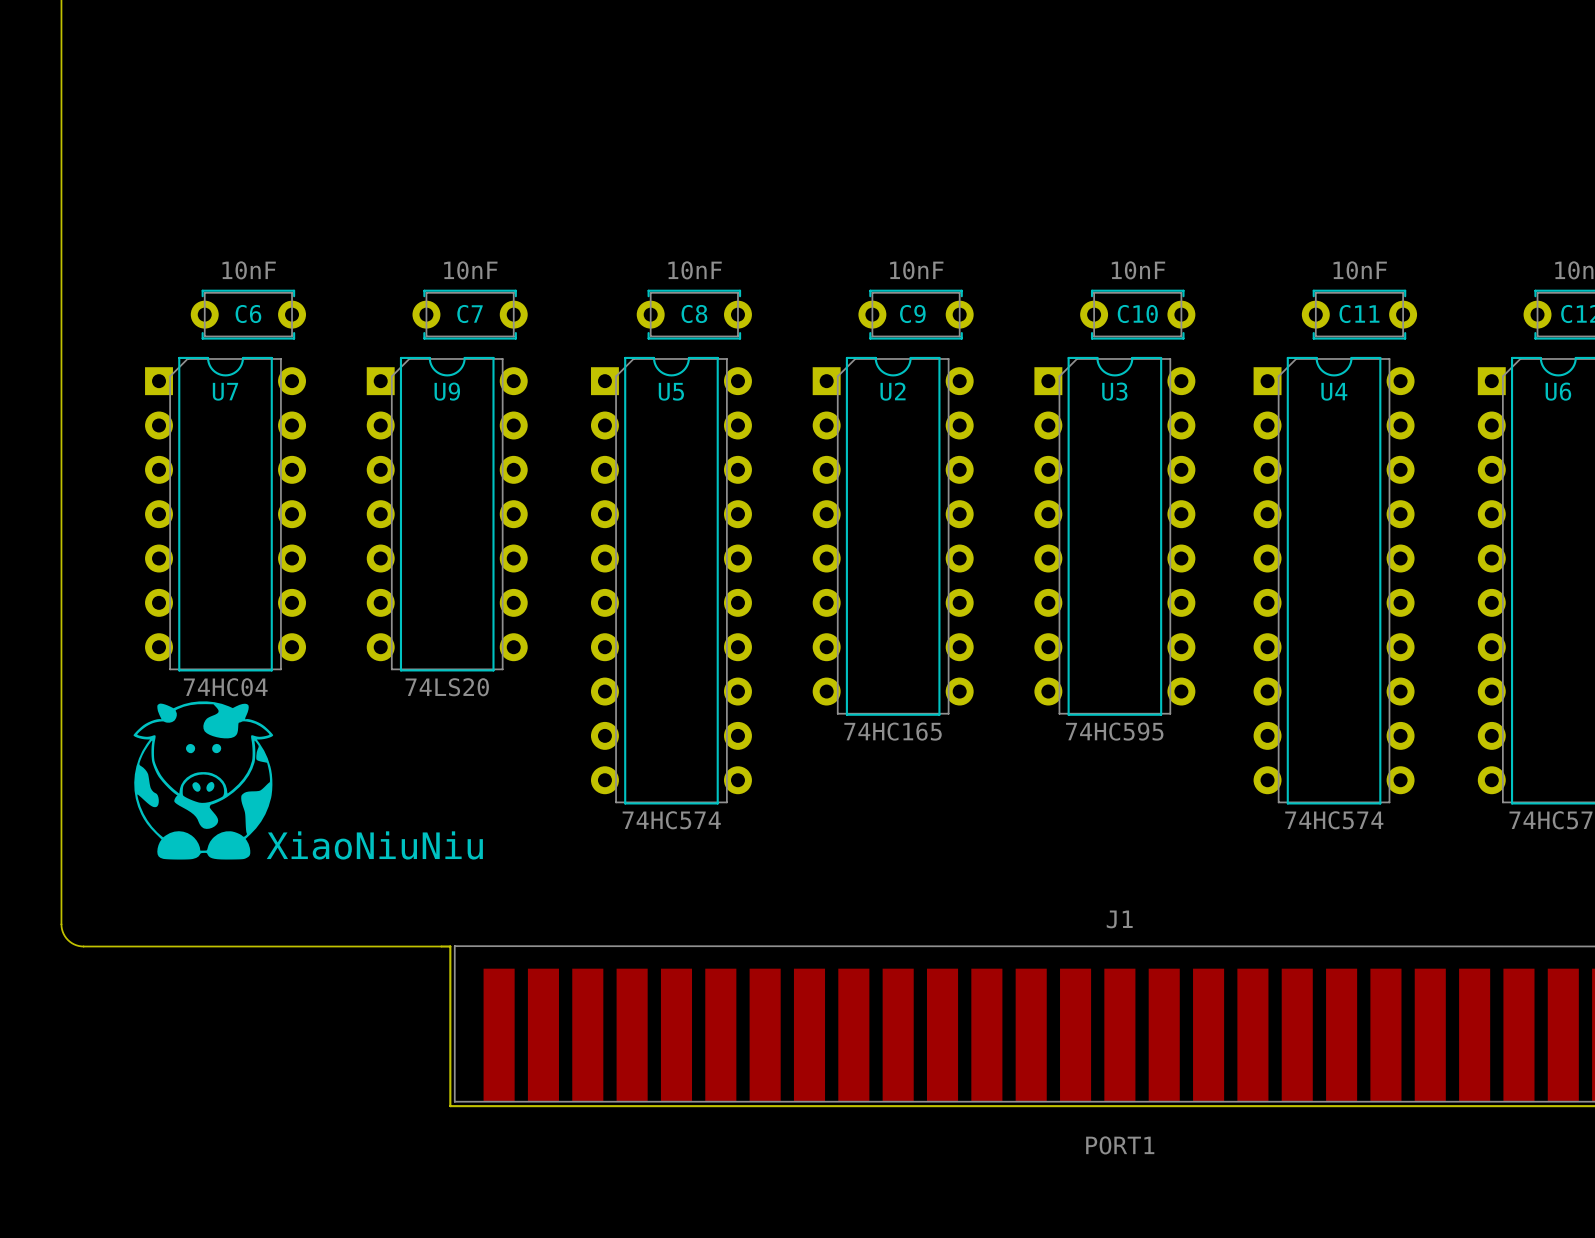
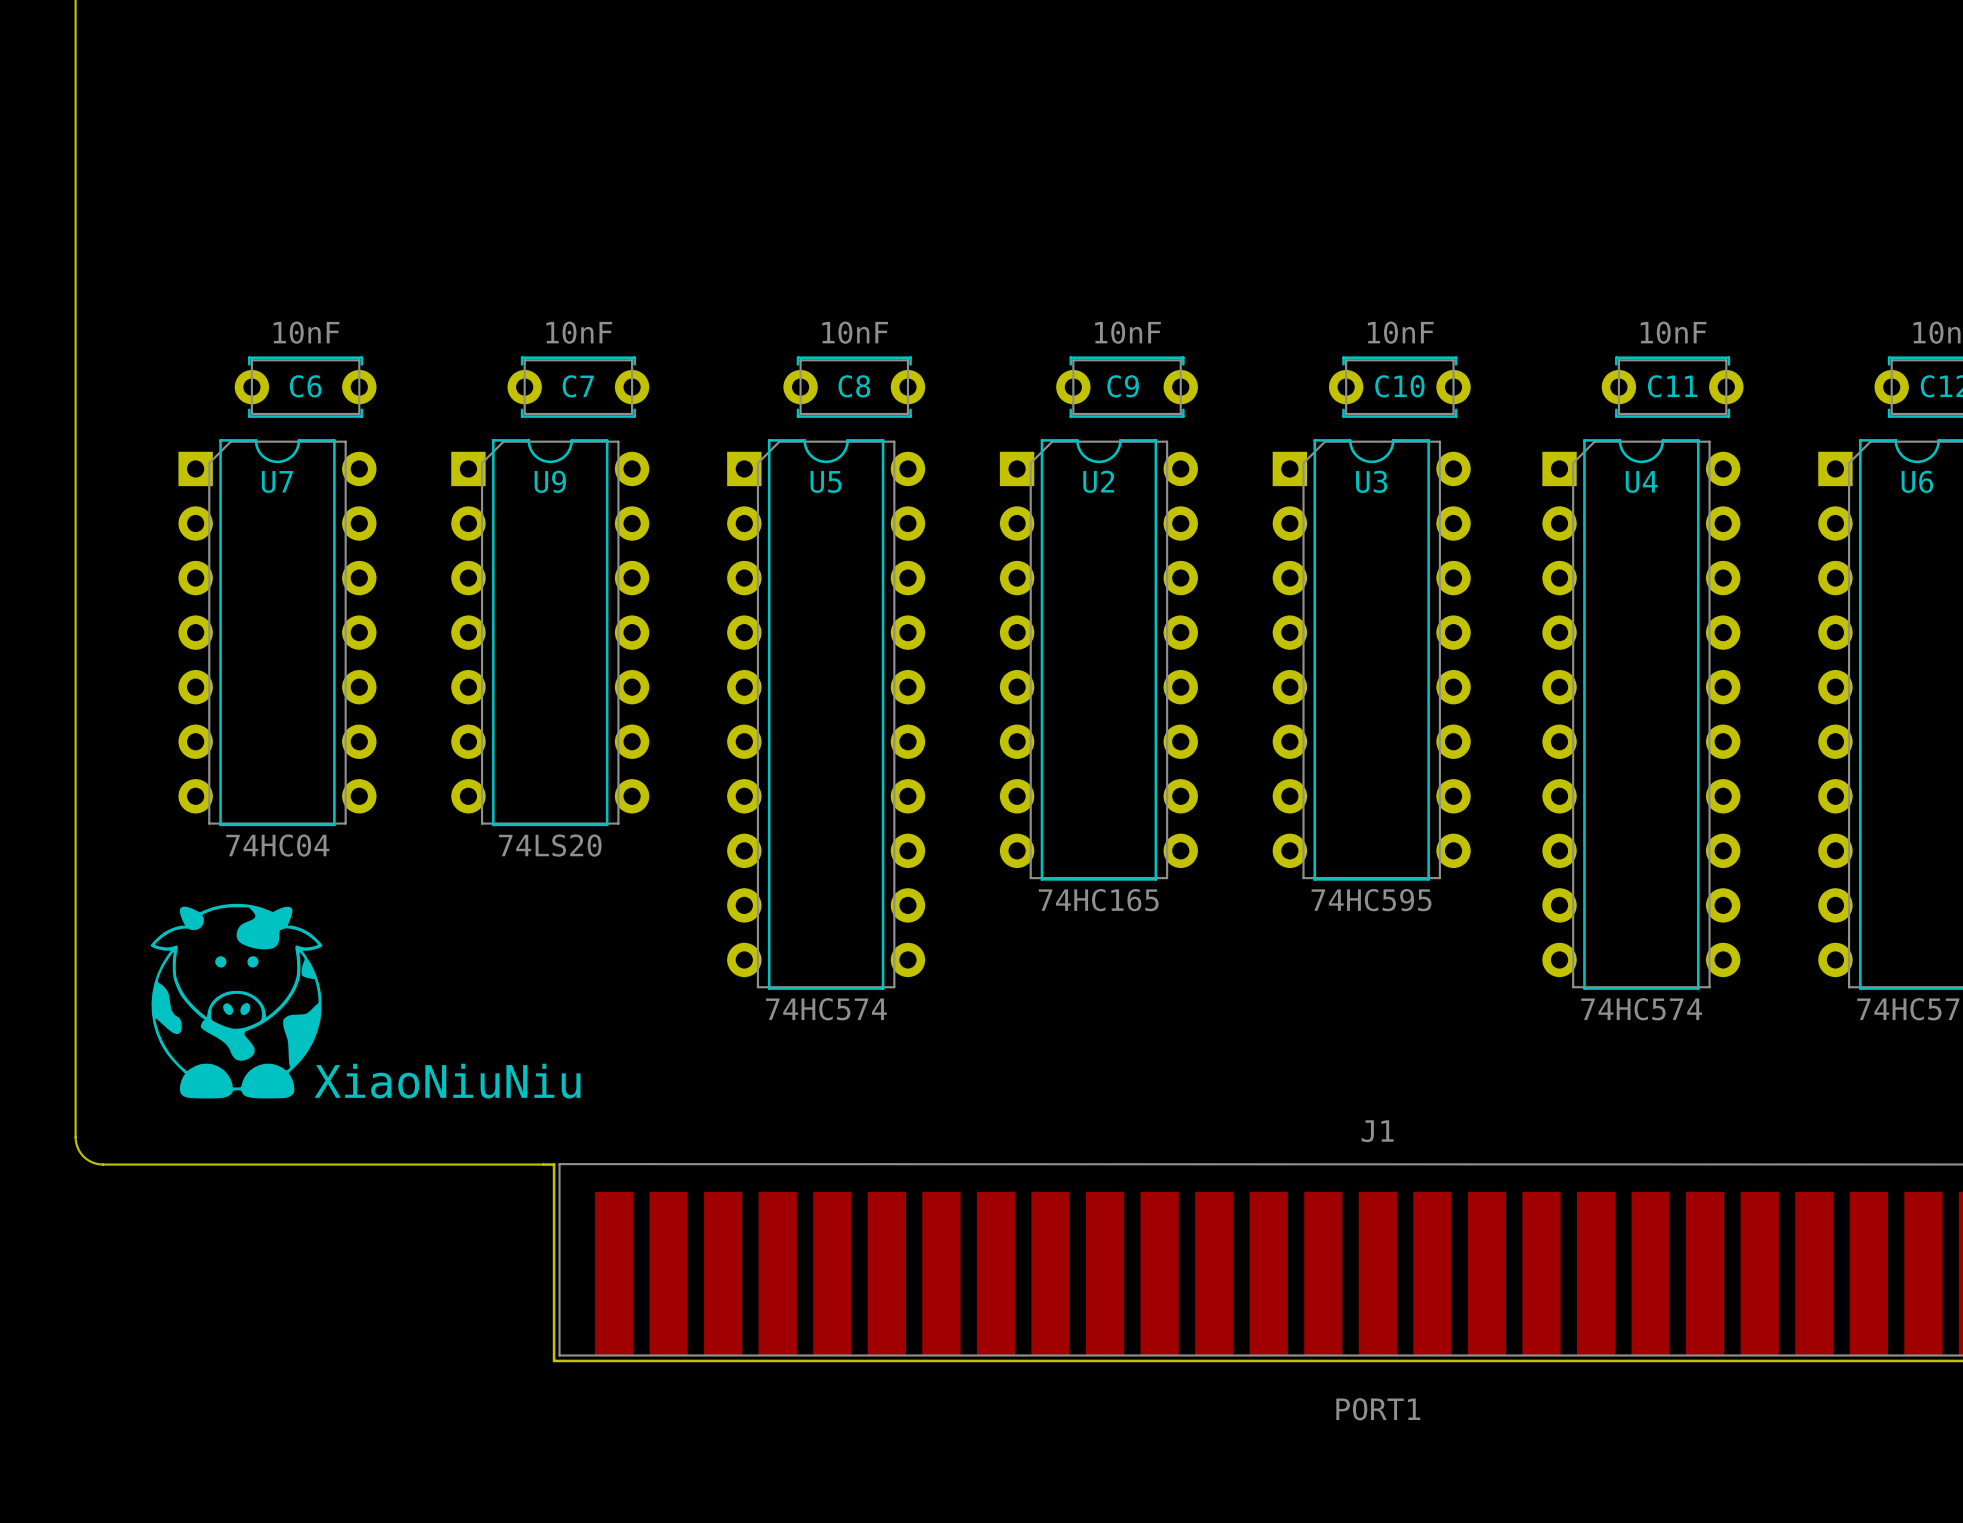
XiaoNiuNiu position: (203, 780) -> (236, 1001)

